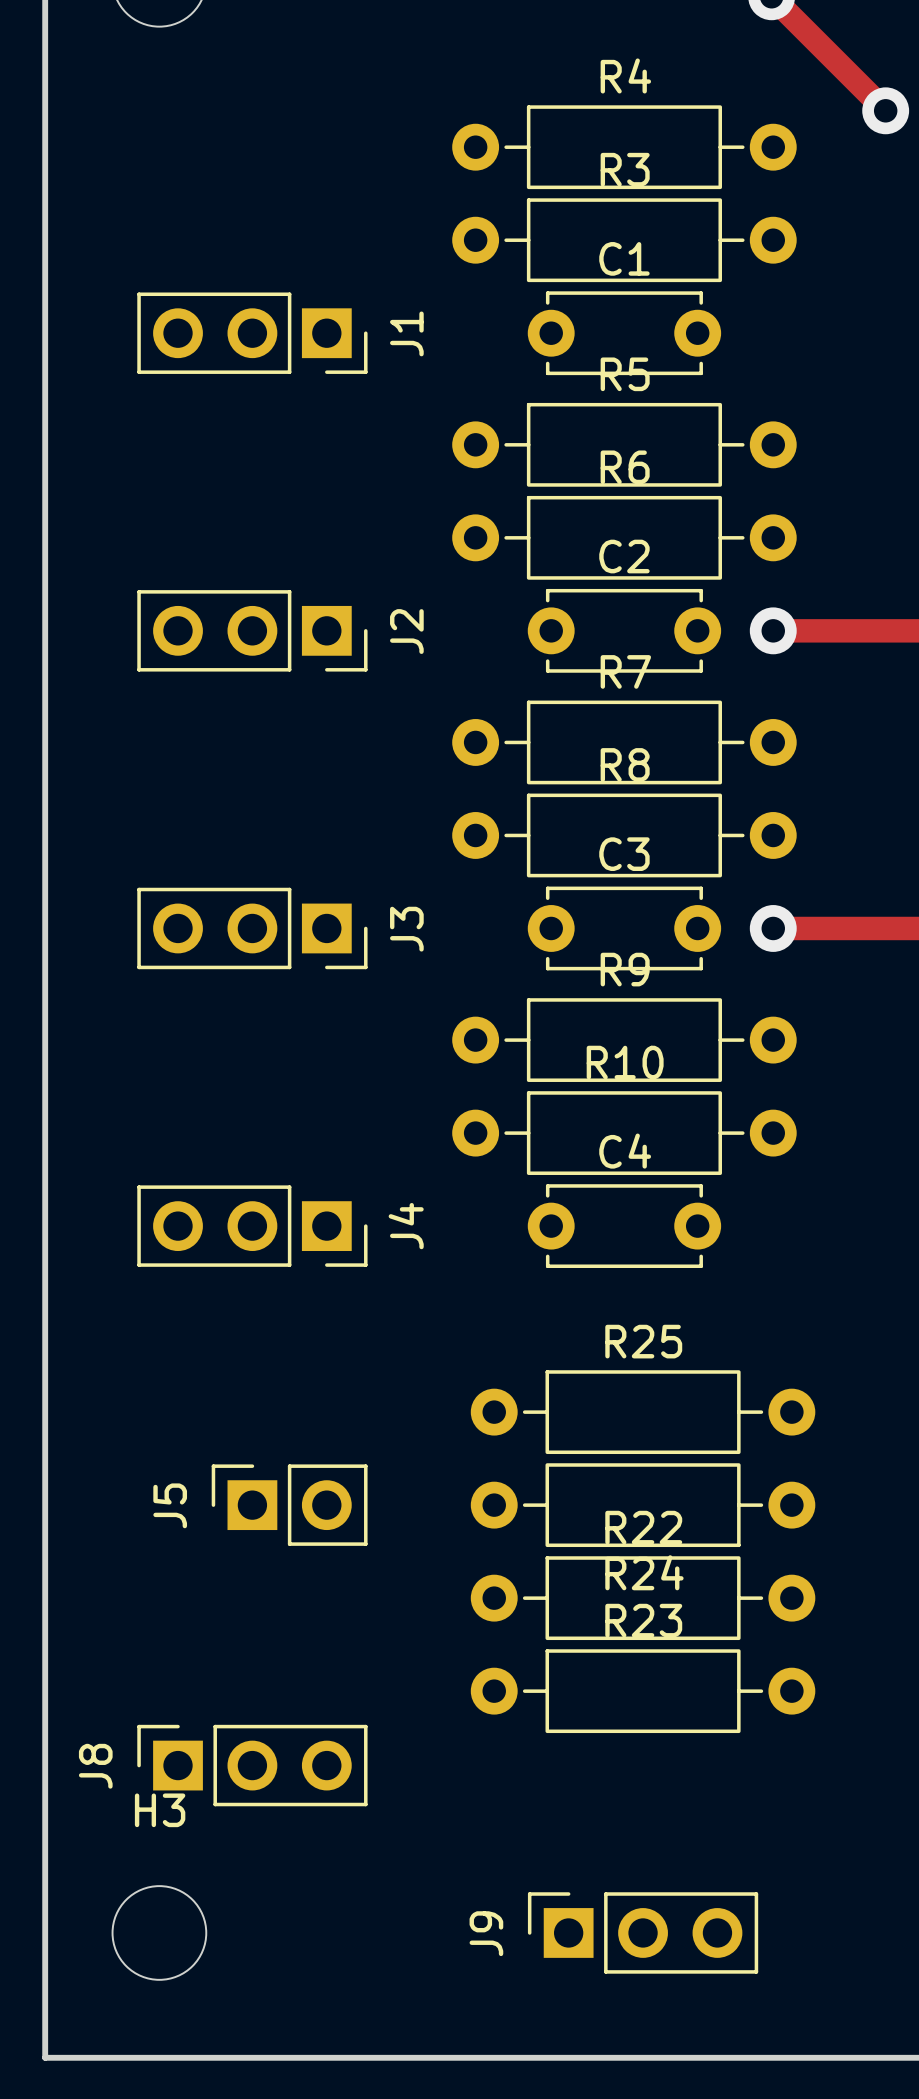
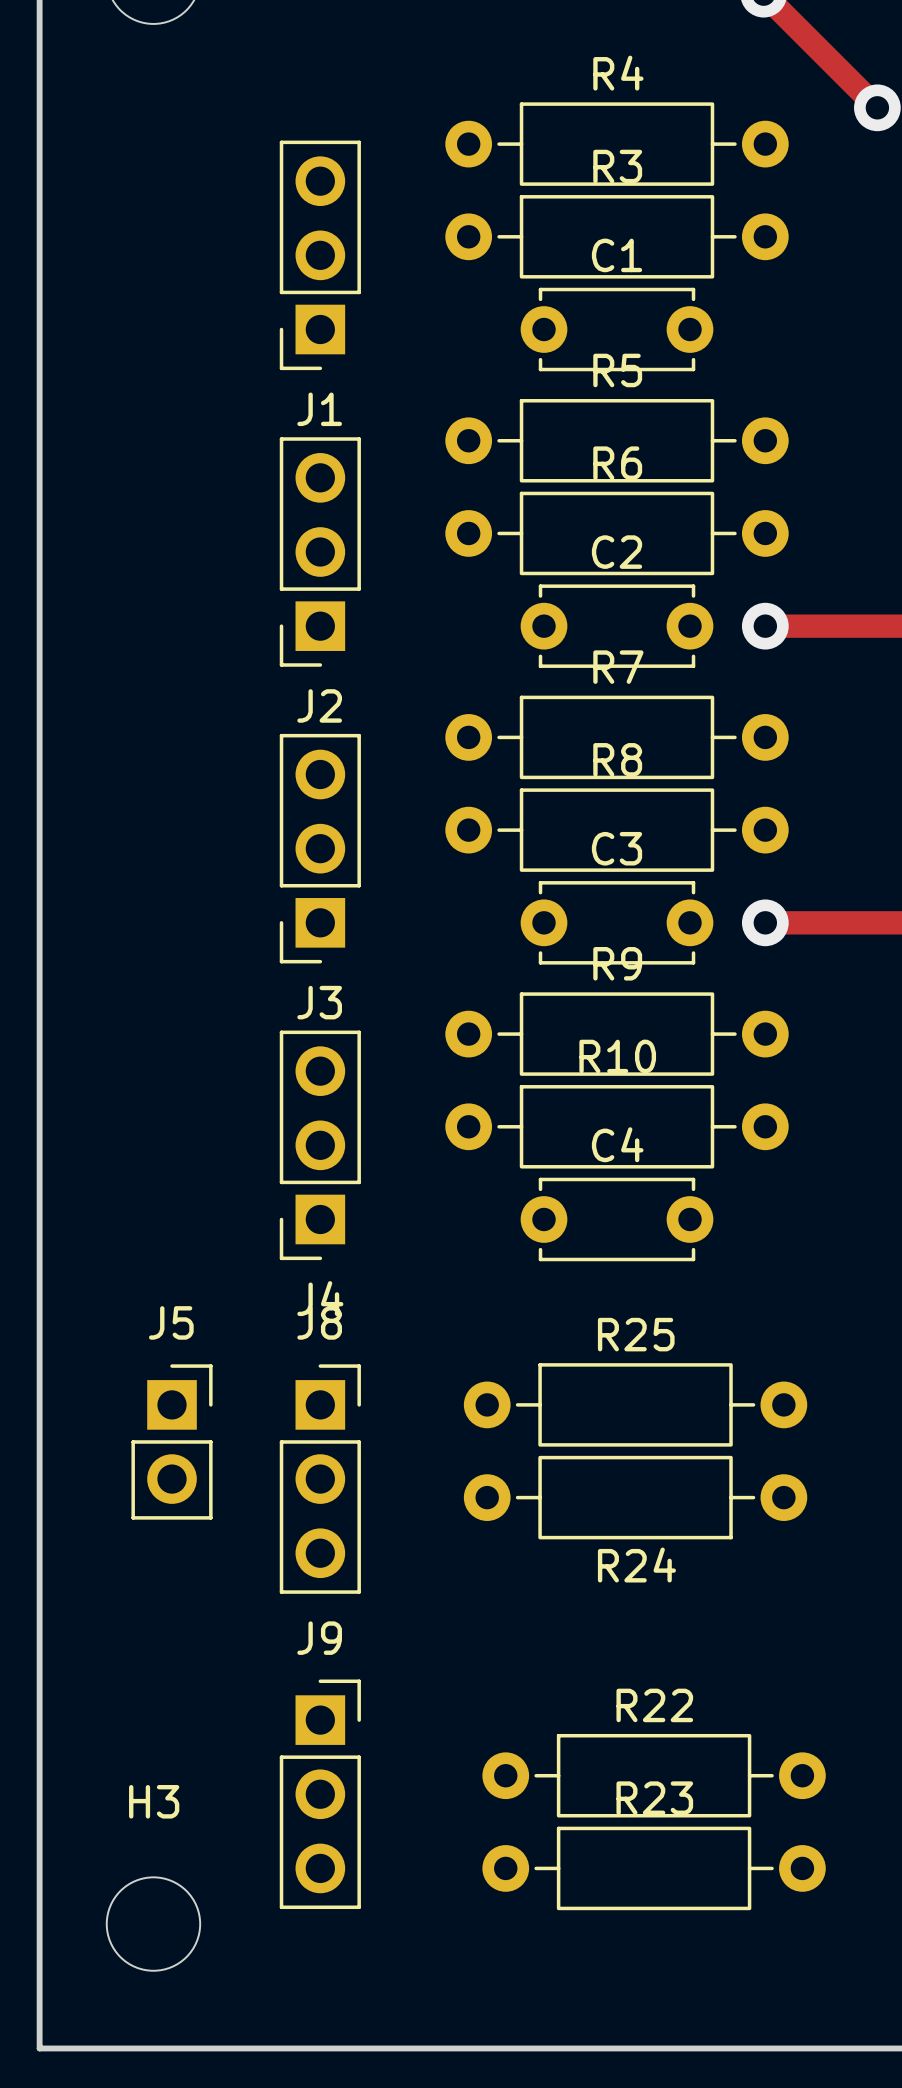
J1 rotation: 0° (252, 333) -> 90° clockwise (320, 255)
J2 rotation: 0° (252, 630) -> 90° clockwise (320, 552)
J3 rotation: 0° (252, 928) -> 90° clockwise (320, 848)
J4 rotation: 0° (252, 1226) -> 90° clockwise (320, 1145)
J5 rotation: 0° (289, 1505) -> 90° clockwise (172, 1441)
J5 position: (289, 1505) -> (172, 1441)
R22 position: (643, 1598) -> (654, 1775)
R23 position: (643, 1691) -> (654, 1868)
J8 rotation: 0° (252, 1765) -> 90° clockwise (320, 1479)
J8 position: (252, 1765) -> (320, 1479)
J9 rotation: 0° (643, 1932) -> 90° clockwise (320, 1794)
J9 position: (643, 1932) -> (320, 1794)

